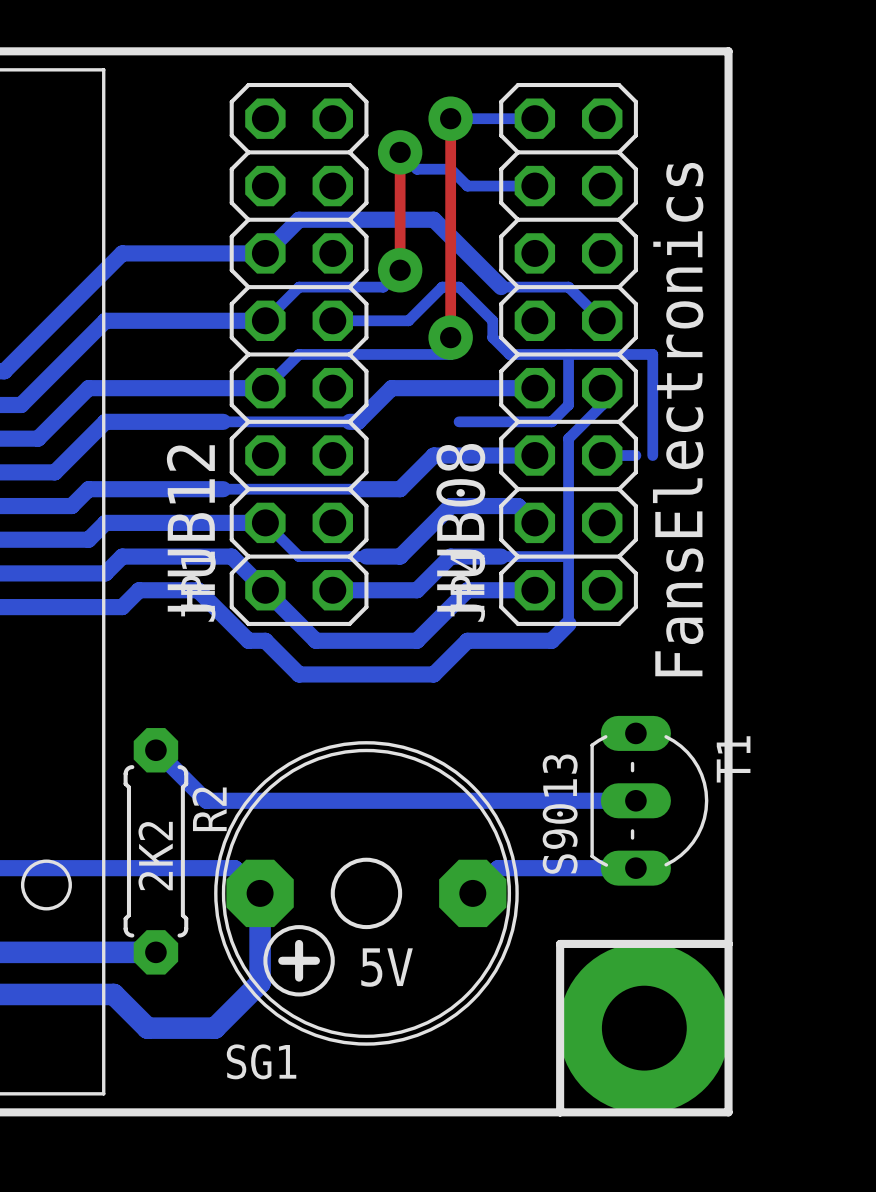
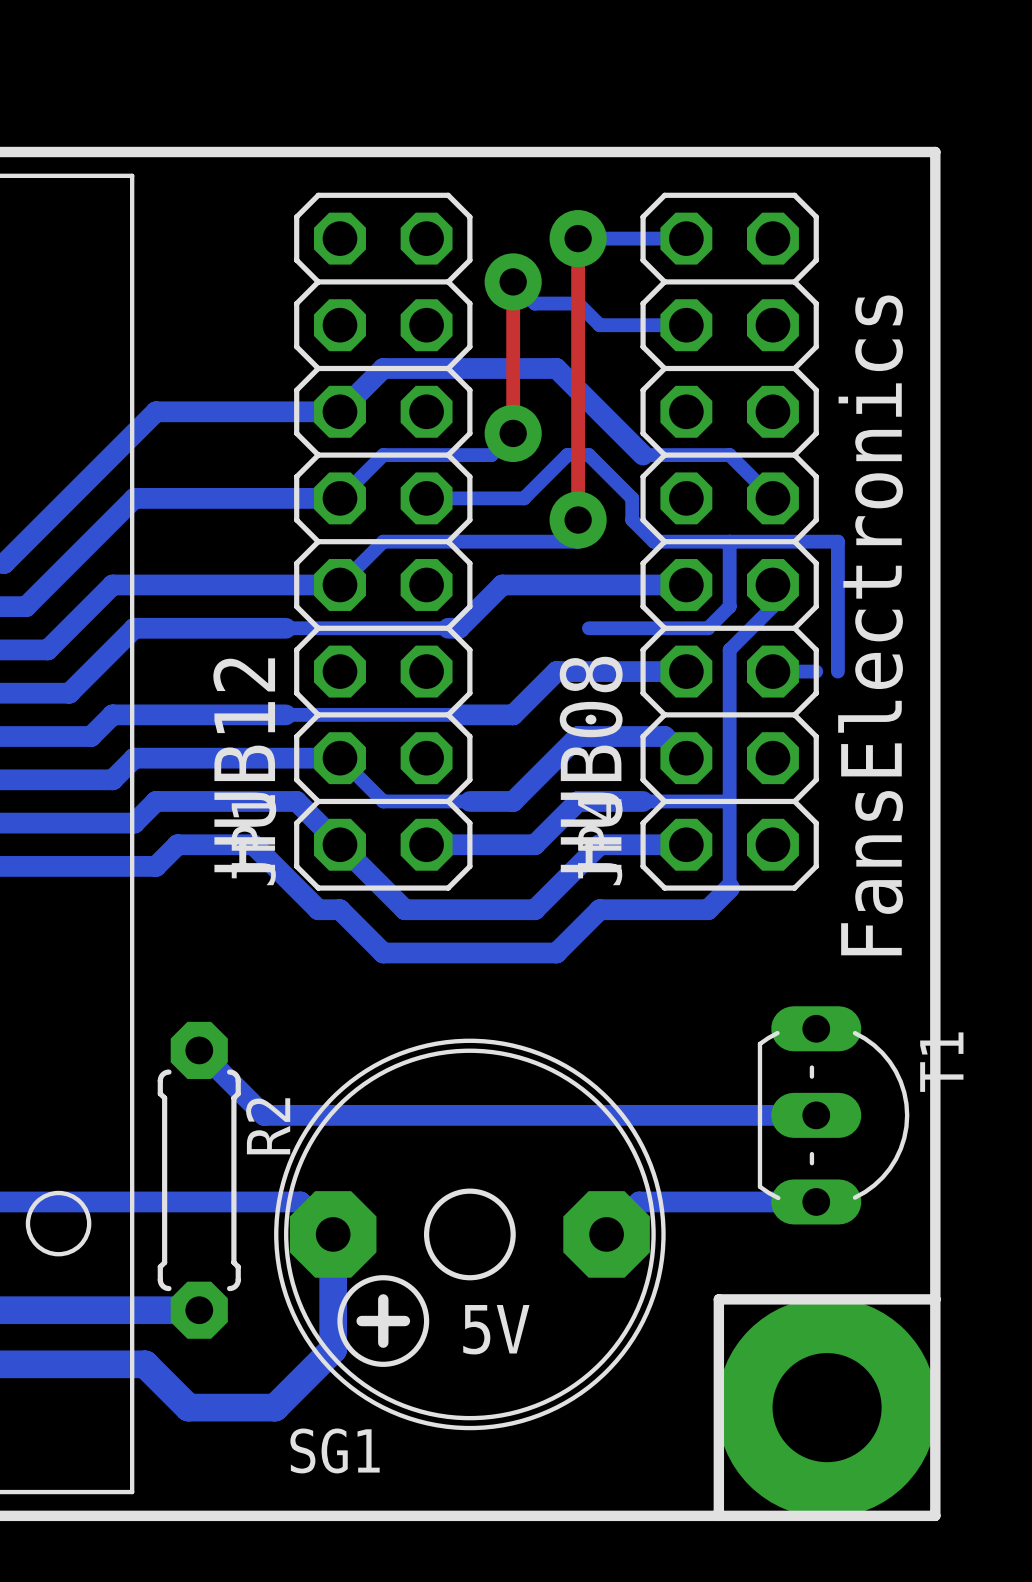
text: S9013 (560, 814) -> none
text: 2K2 (155, 856) -> none

